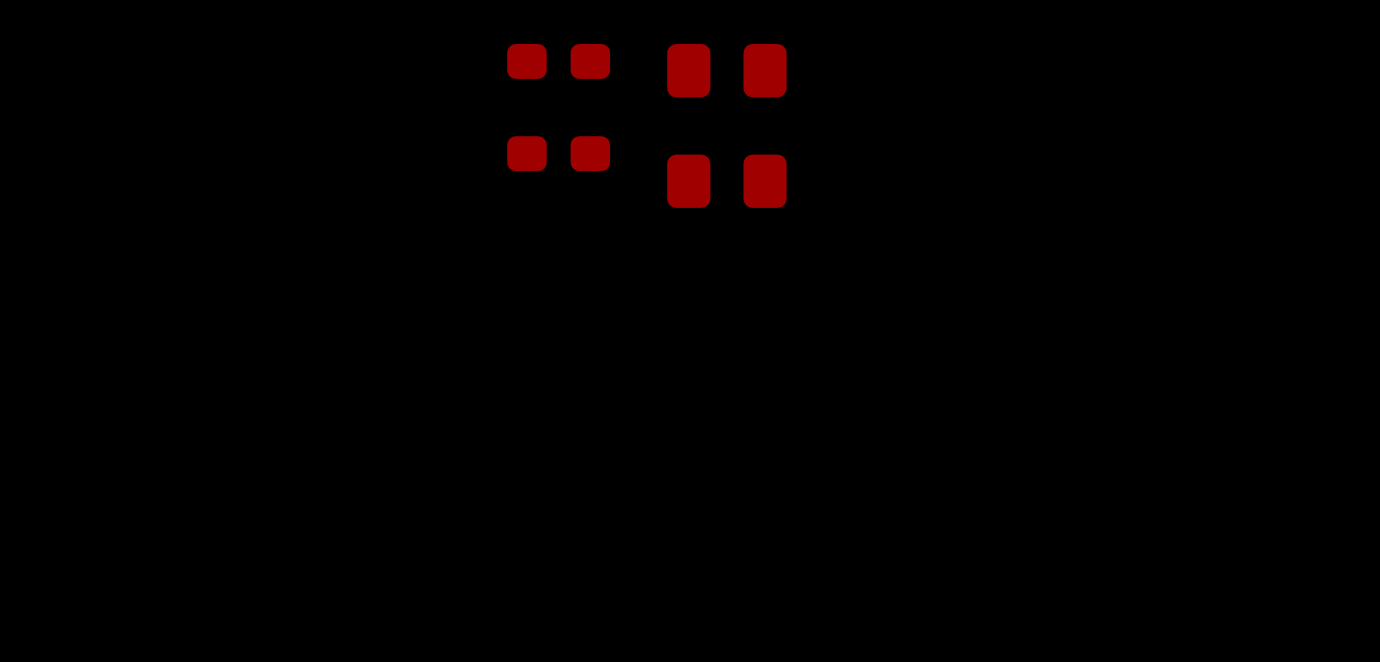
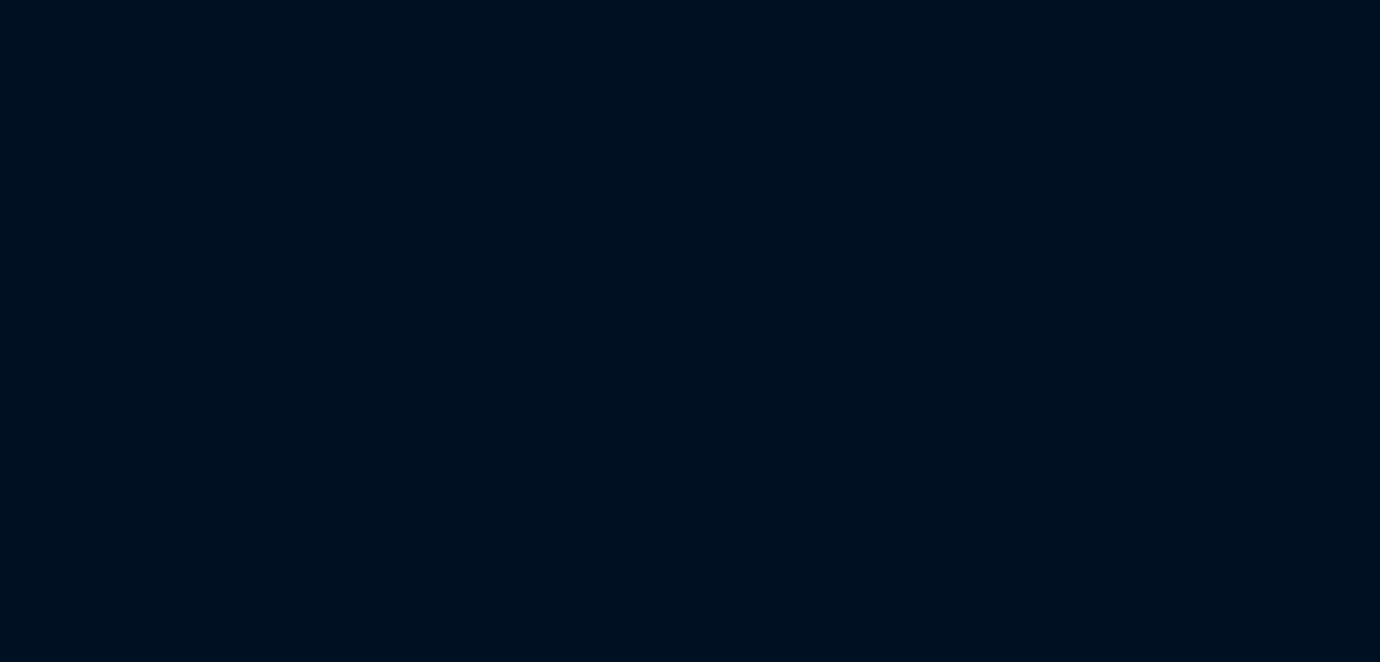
part: (558, 61) -> none
part: (726, 70) -> none
part: (558, 153) -> none
part: (726, 181) -> none

